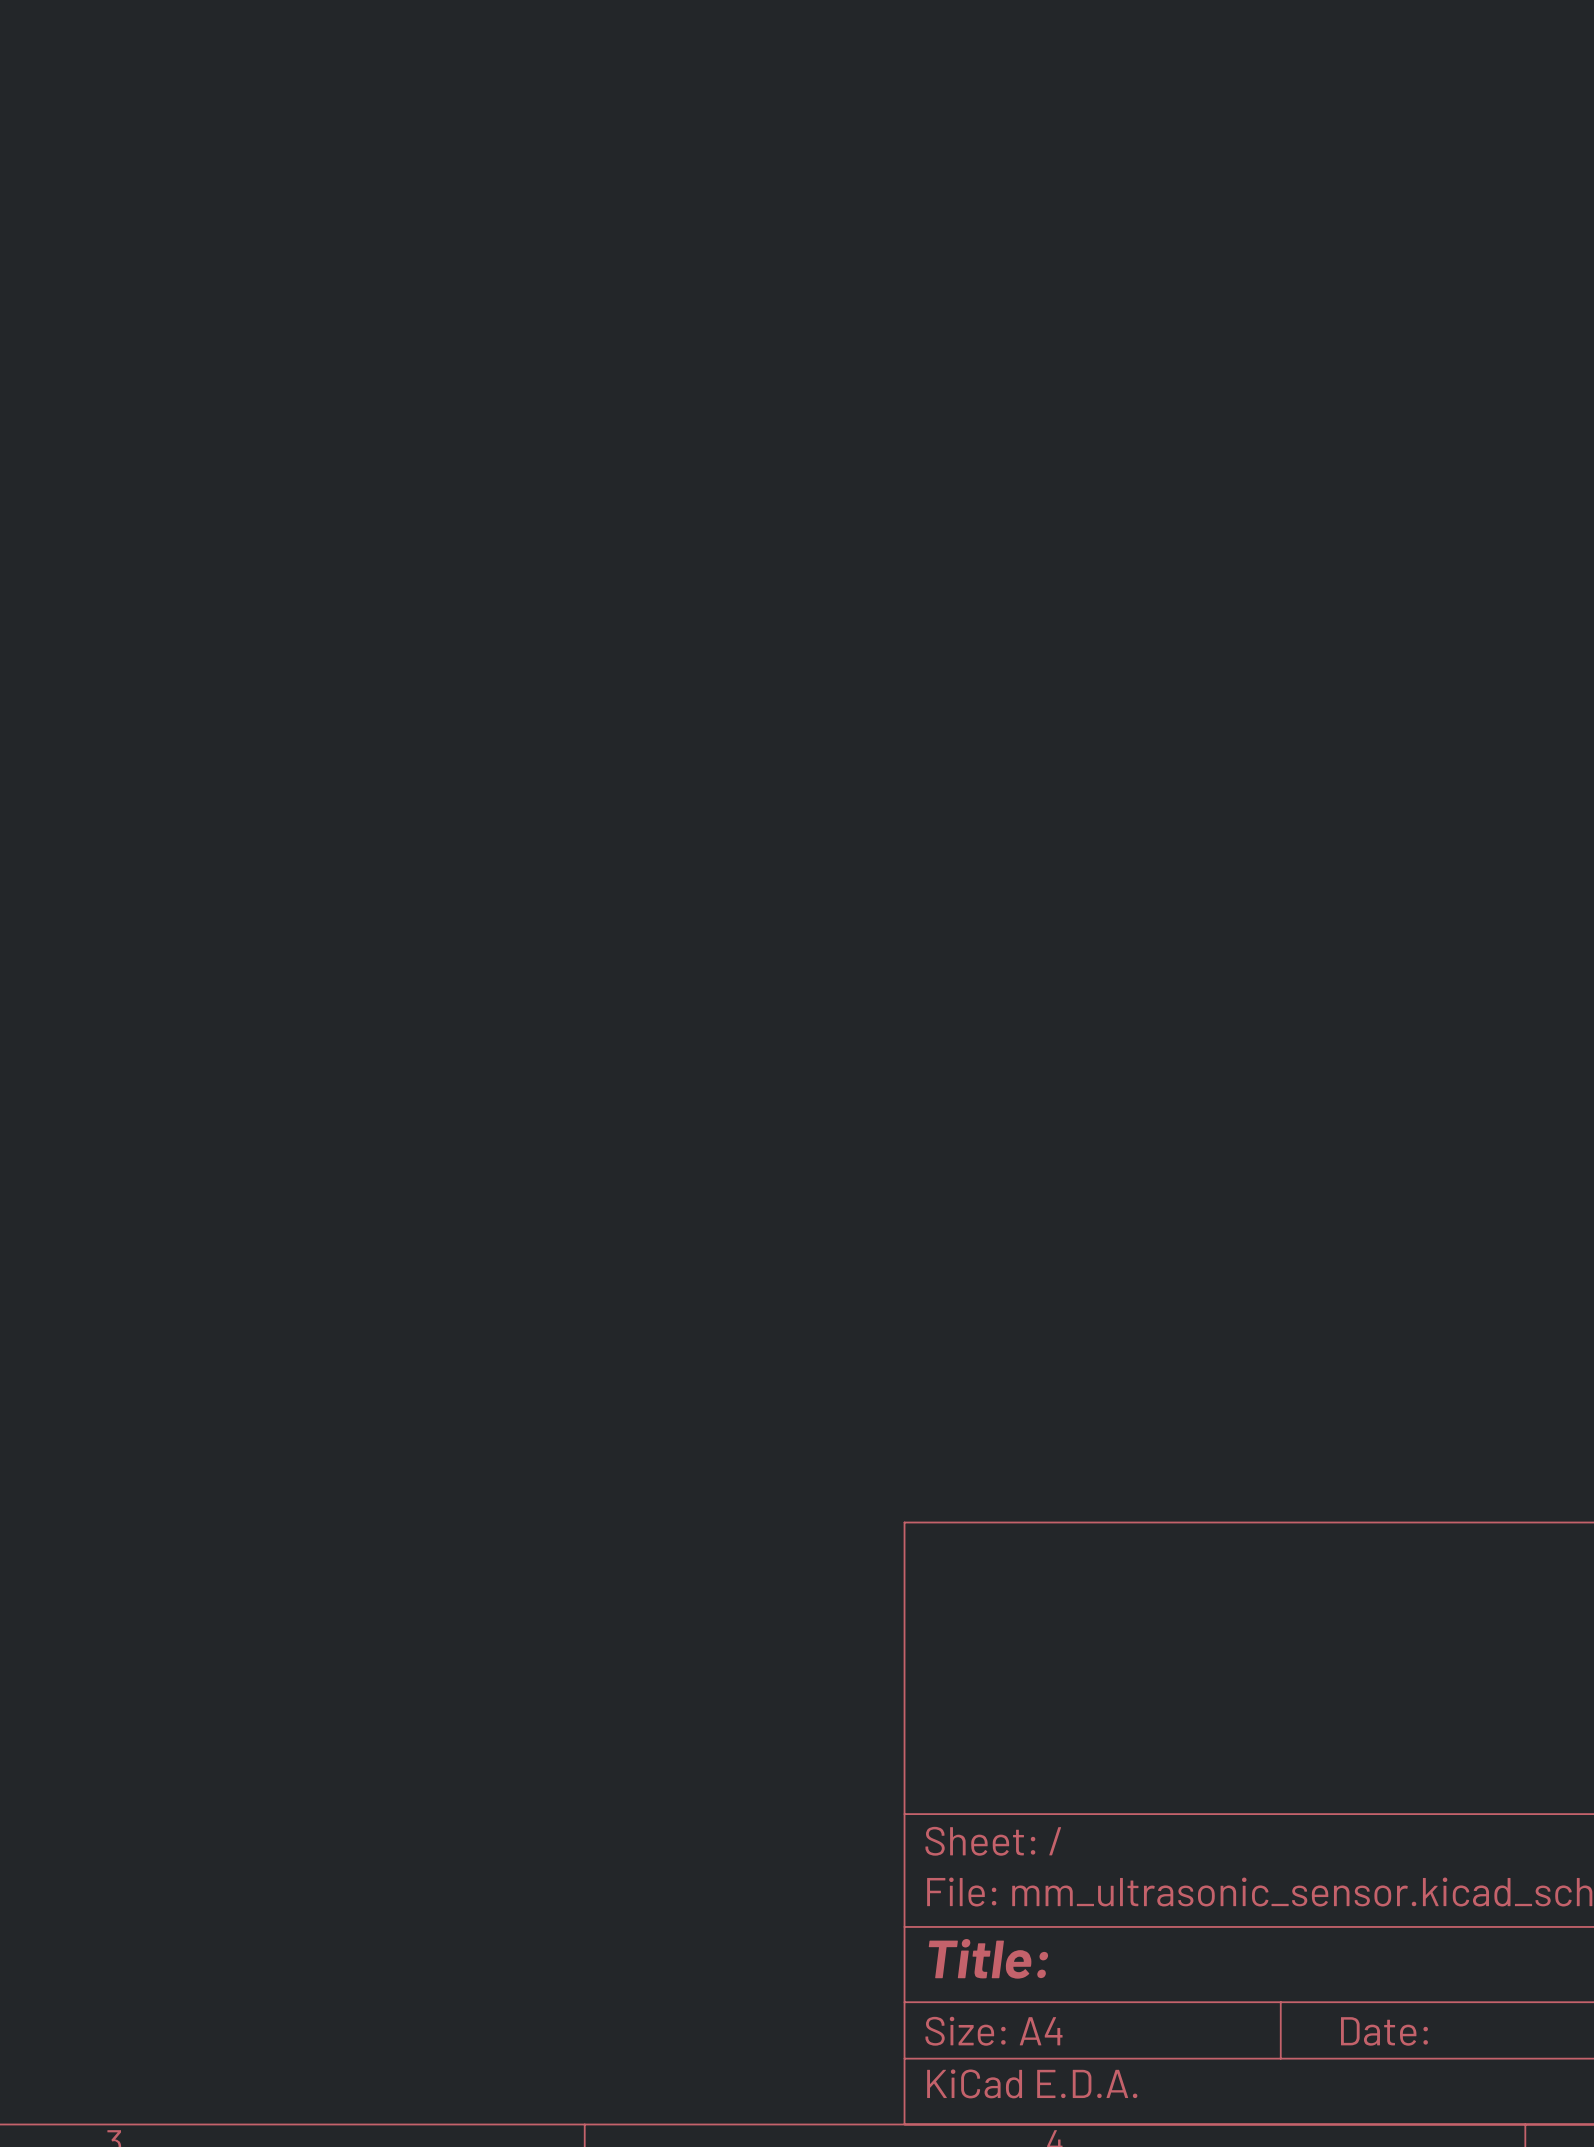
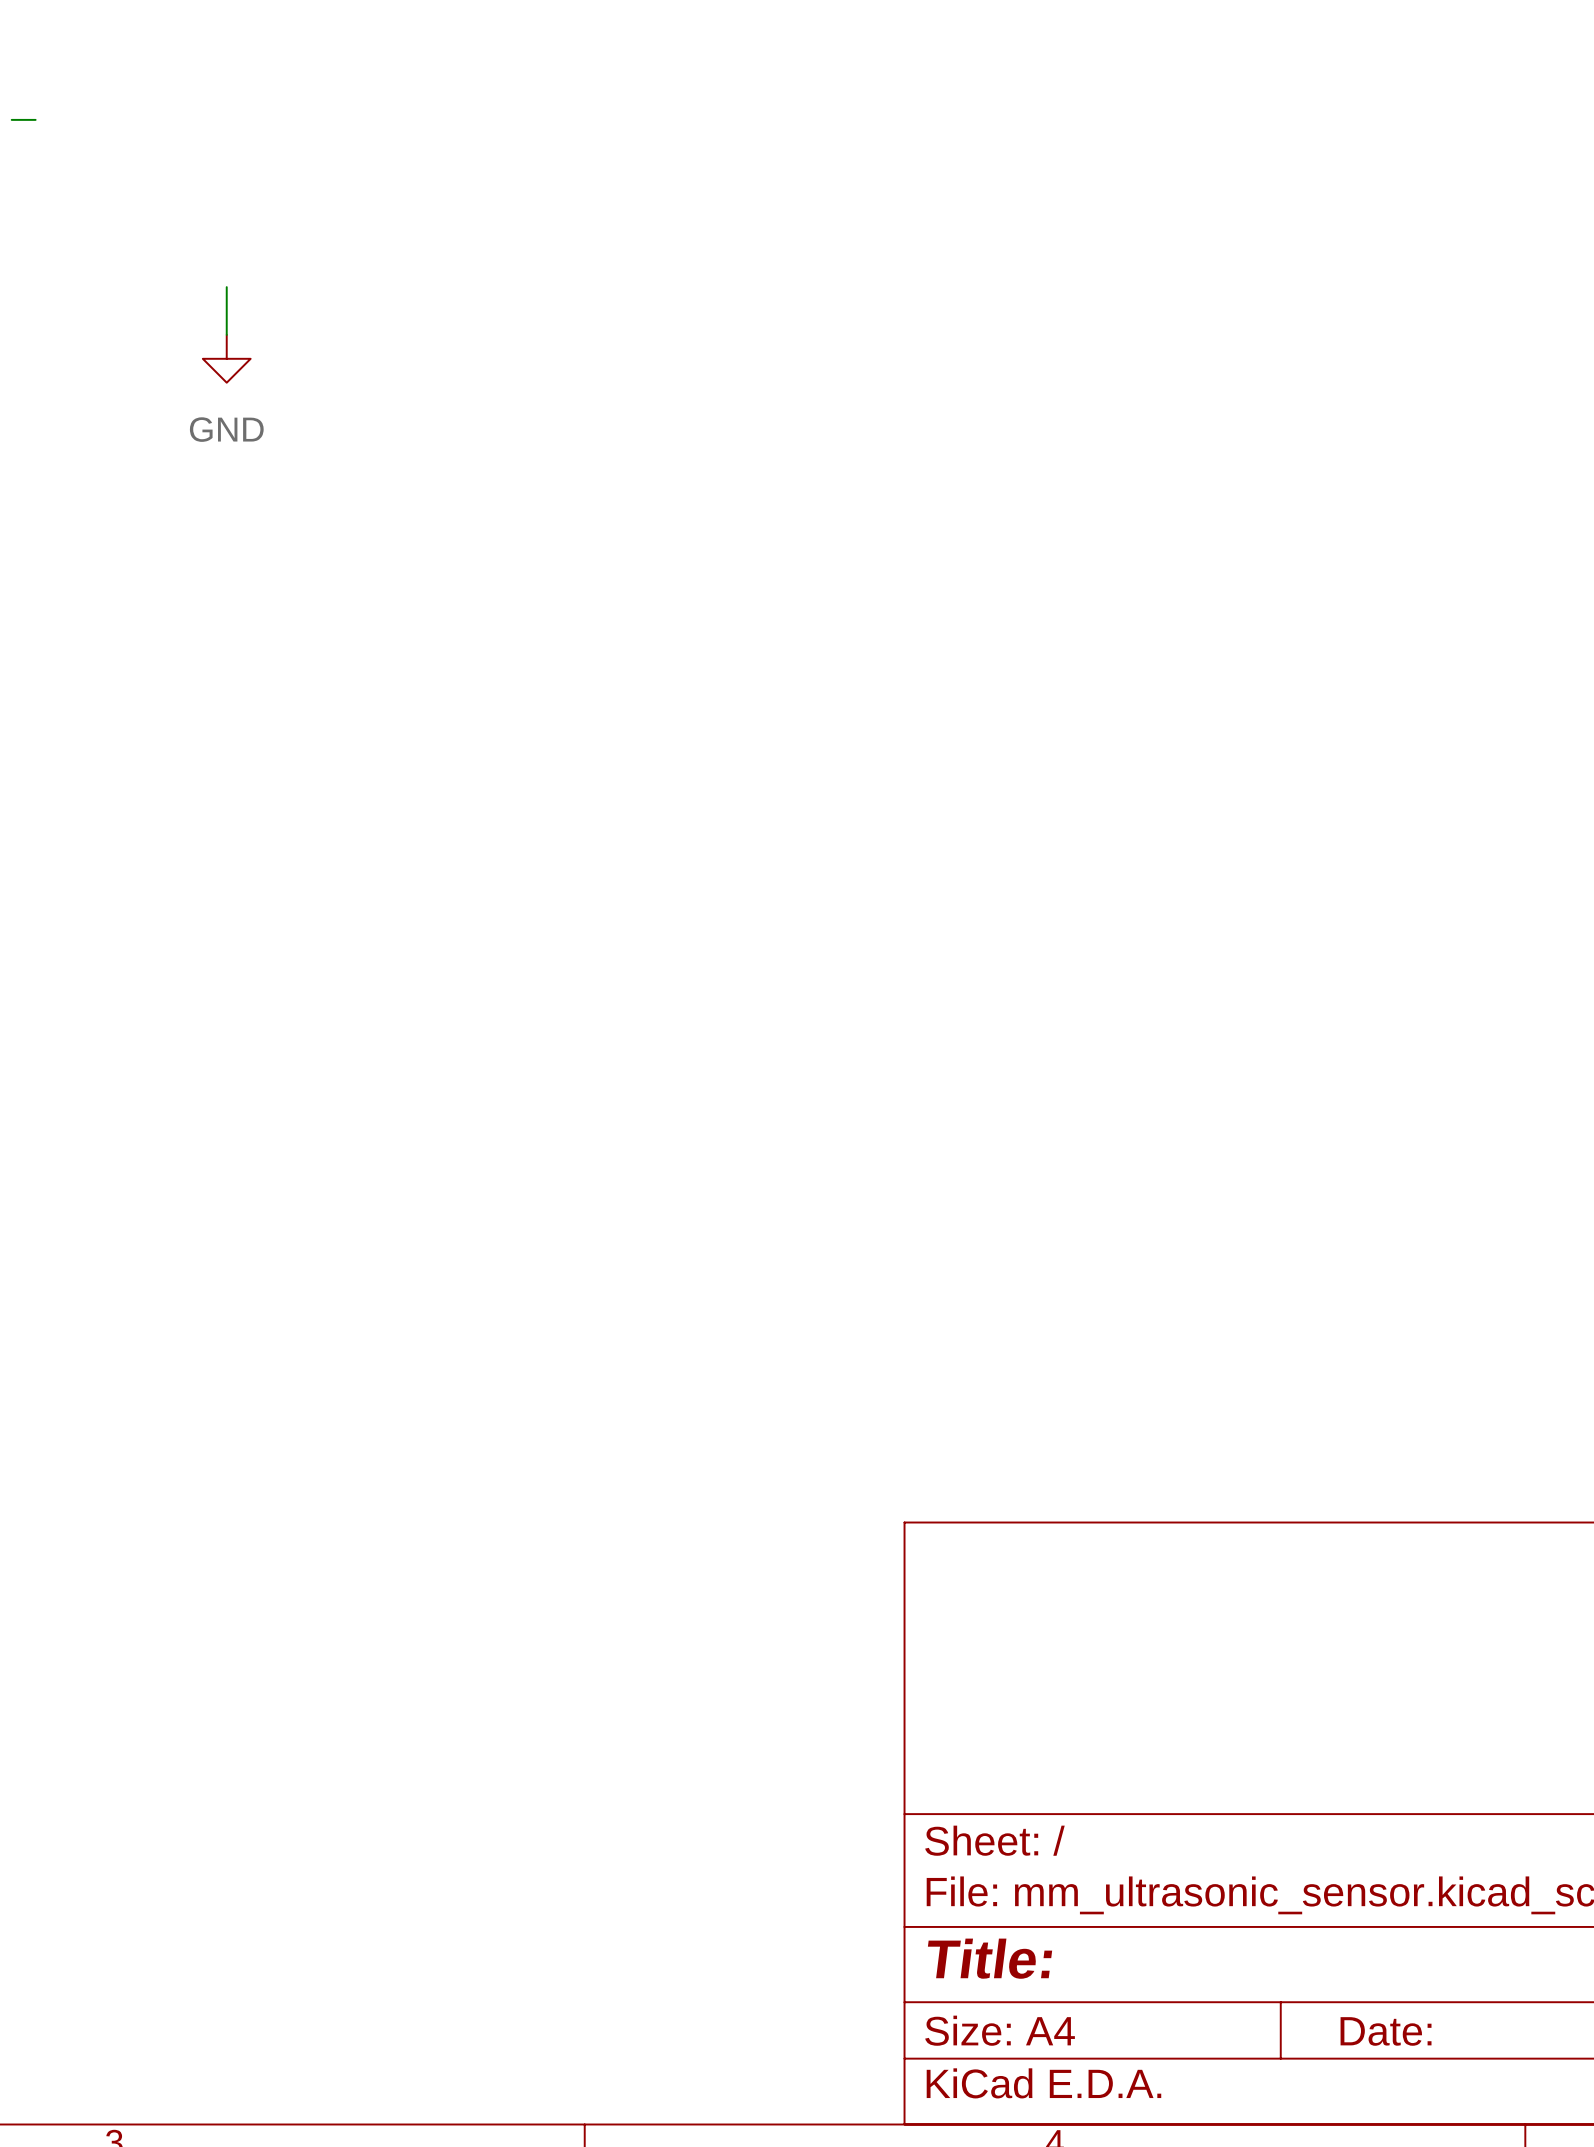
wire: none -> (11, 119) (35, 119)
wire: none -> (226, 287) (226, 334)
power symbol: none -> GND (226, 358)

